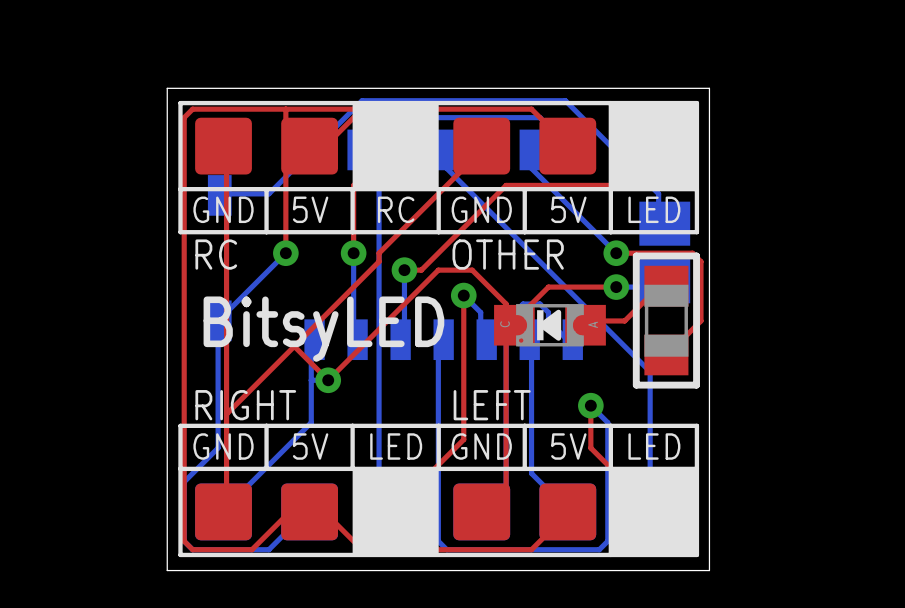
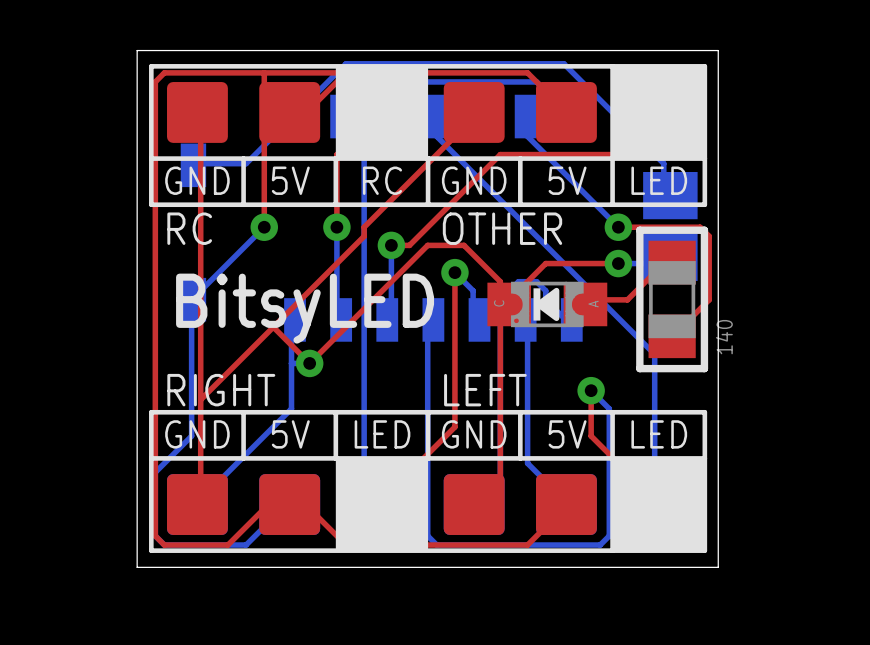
part value: none -> 140 (724, 337)

